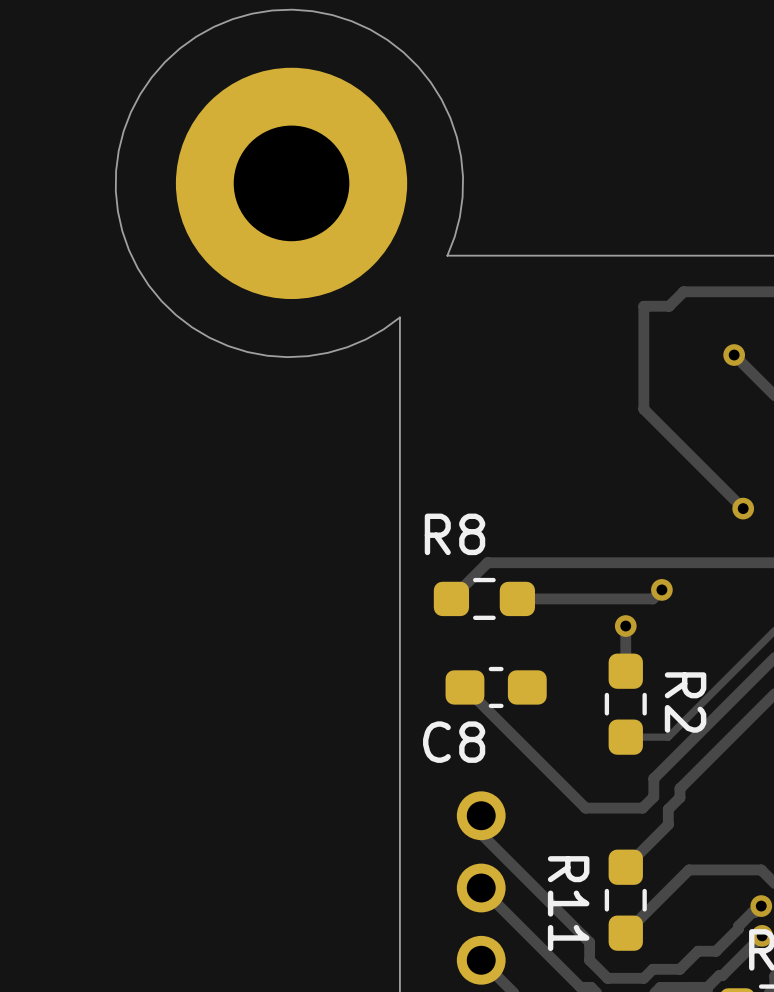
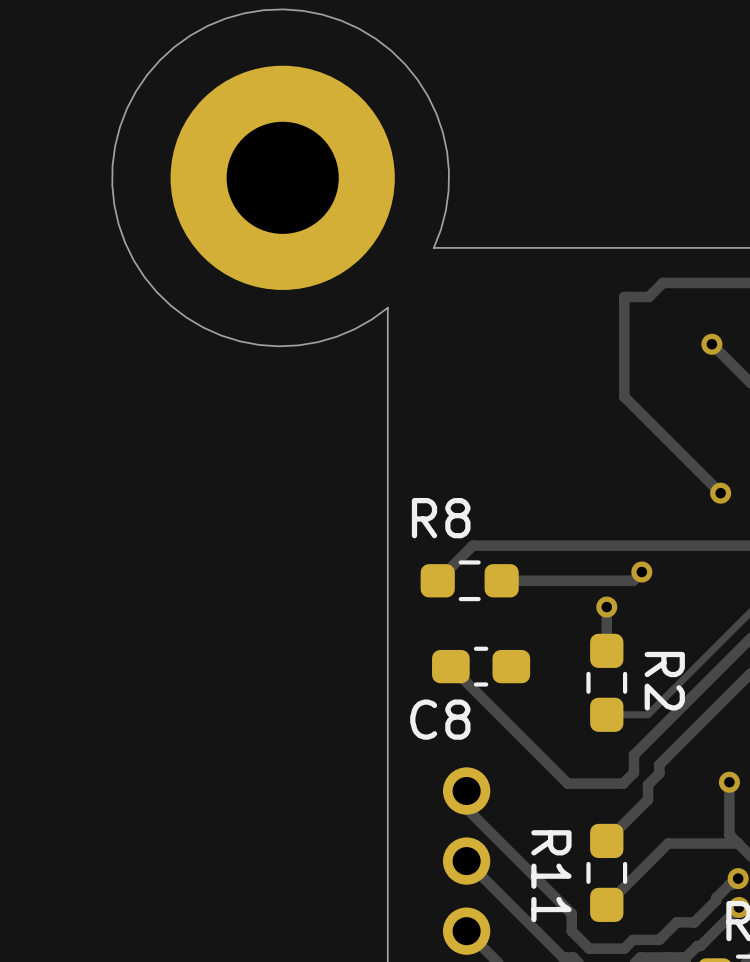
track: none -> (729, 782) (729, 834) (738, 843)
via: none -> (729, 782)

